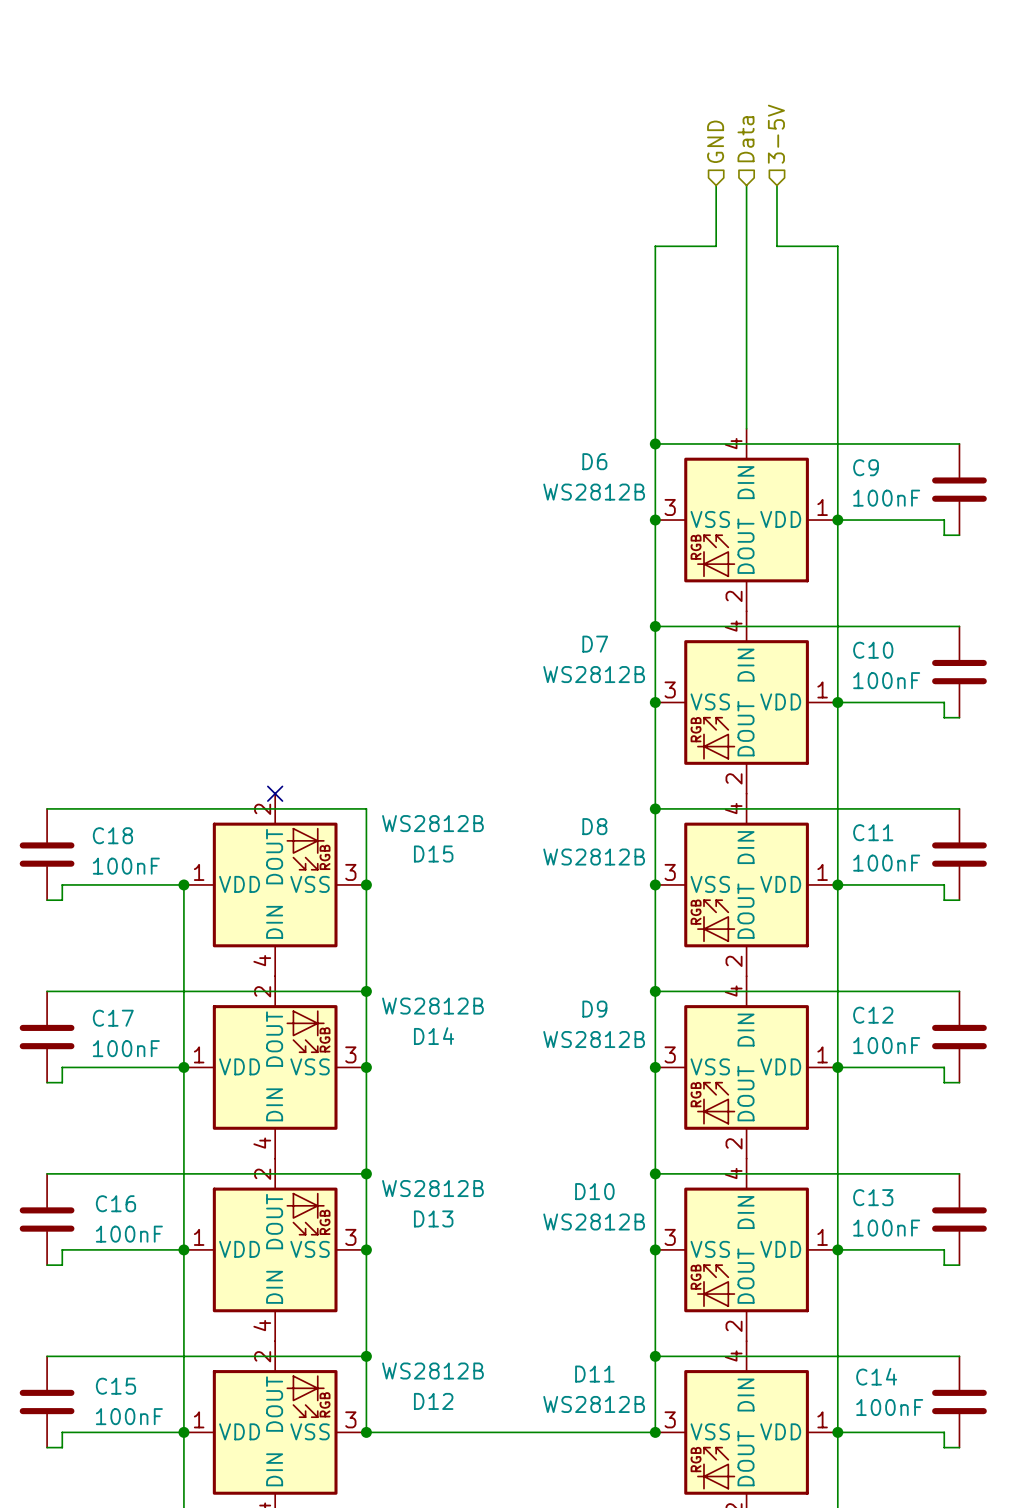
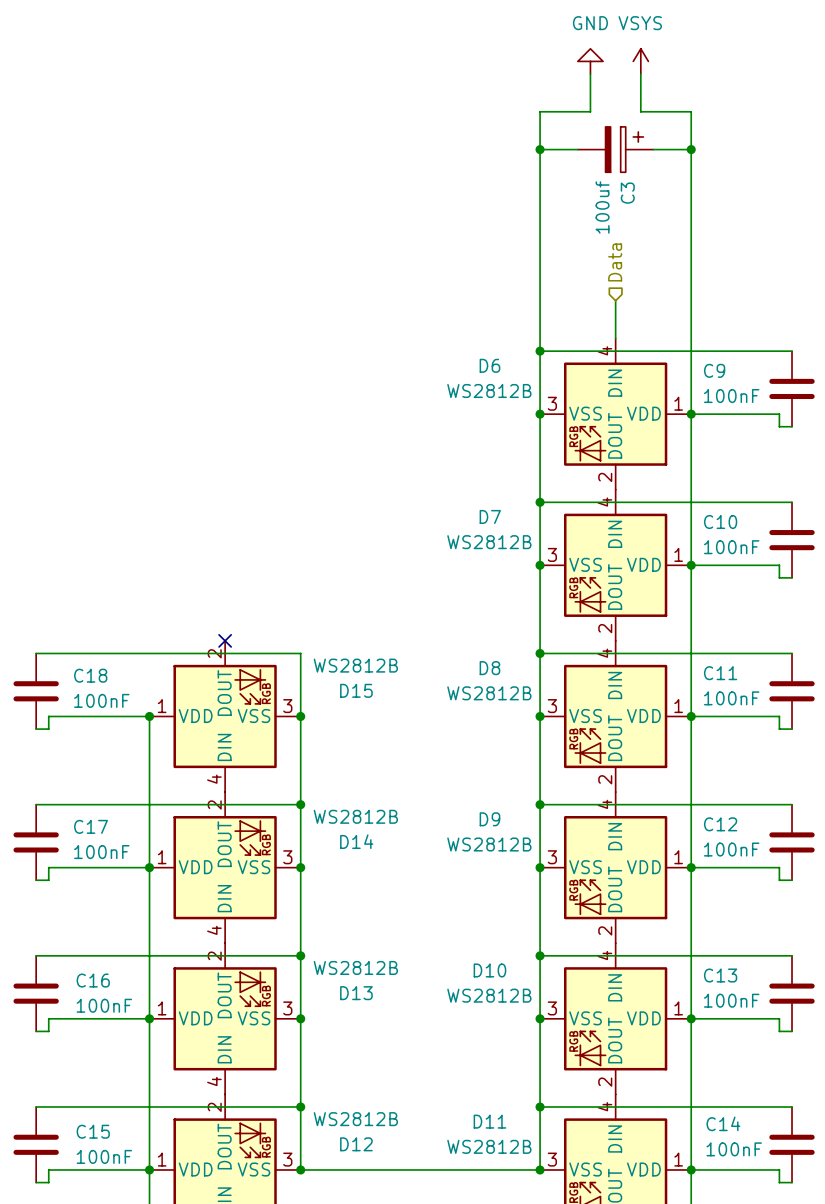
power symbol: none -> GND (590, 61)
power symbol: none -> VSYS (640, 61)
hierarchical label: 3-5V (776, 134) -> none
hierarchical label position: Data (746, 139) -> Data (615, 262)
hierarchical label: GND (715, 141) -> none
wire: (716, 185) (716, 246) (655, 246) -> (590, 74) (590, 111) (540, 111) (540, 187)
wire: (746, 185) (746, 383) -> none
wire: (776, 185) (776, 246) (837, 246) -> (640, 74) (640, 111) (691, 111) (691, 187)
wire: none -> (540, 149) (577, 149)
junction: none -> (540, 149)
C3: none -> 100uf (615, 149)
wire: none -> (653, 149) (691, 149)
junction: none -> (691, 149)

